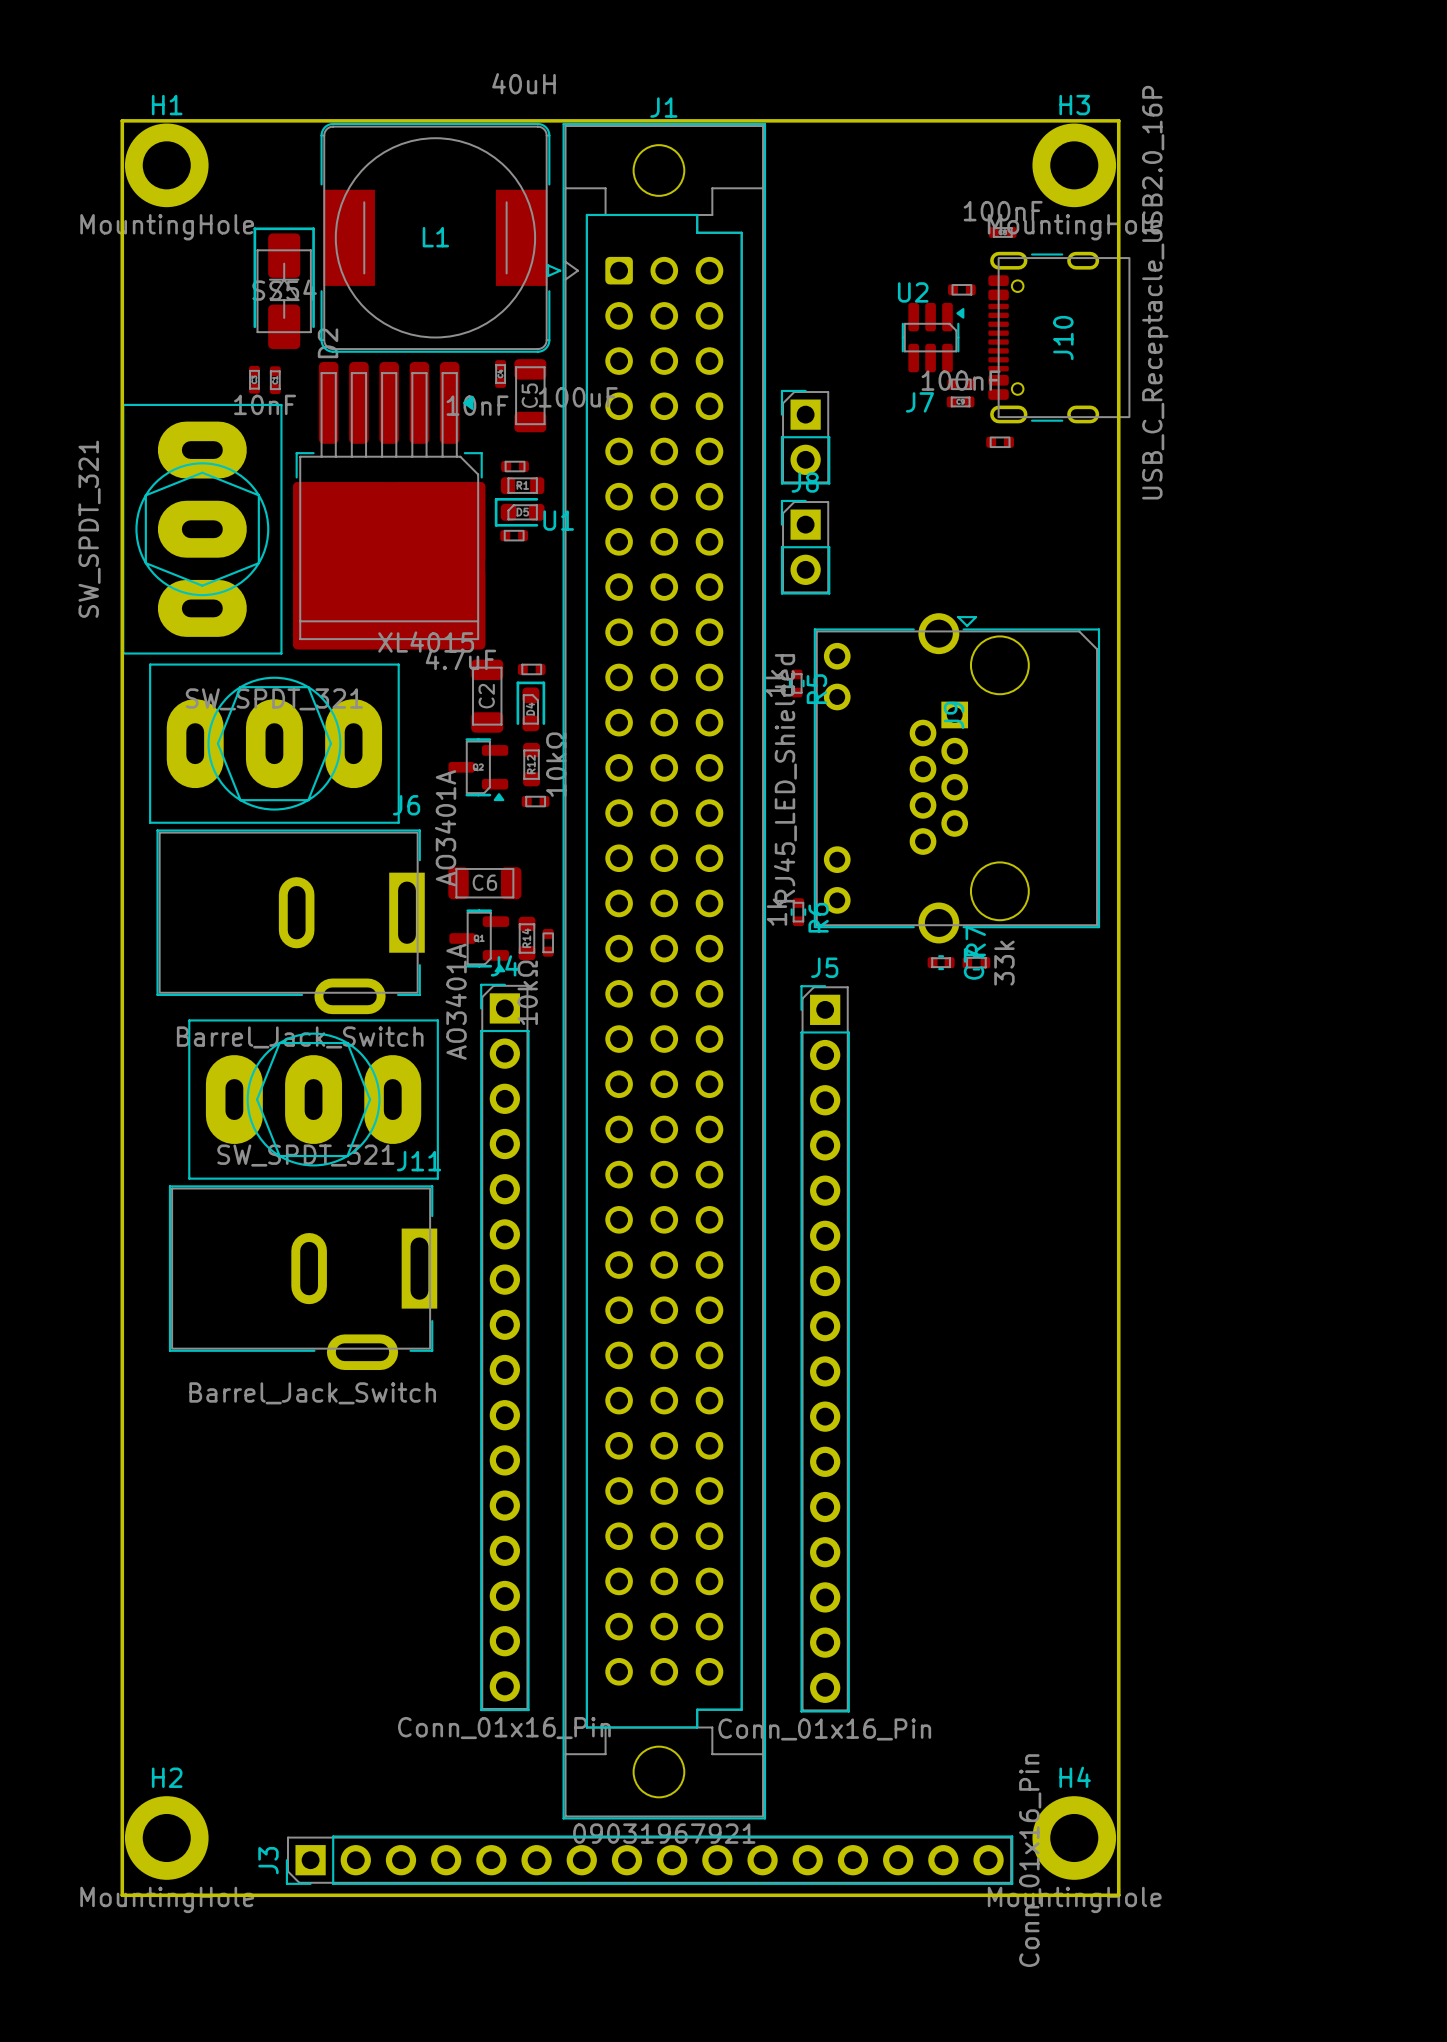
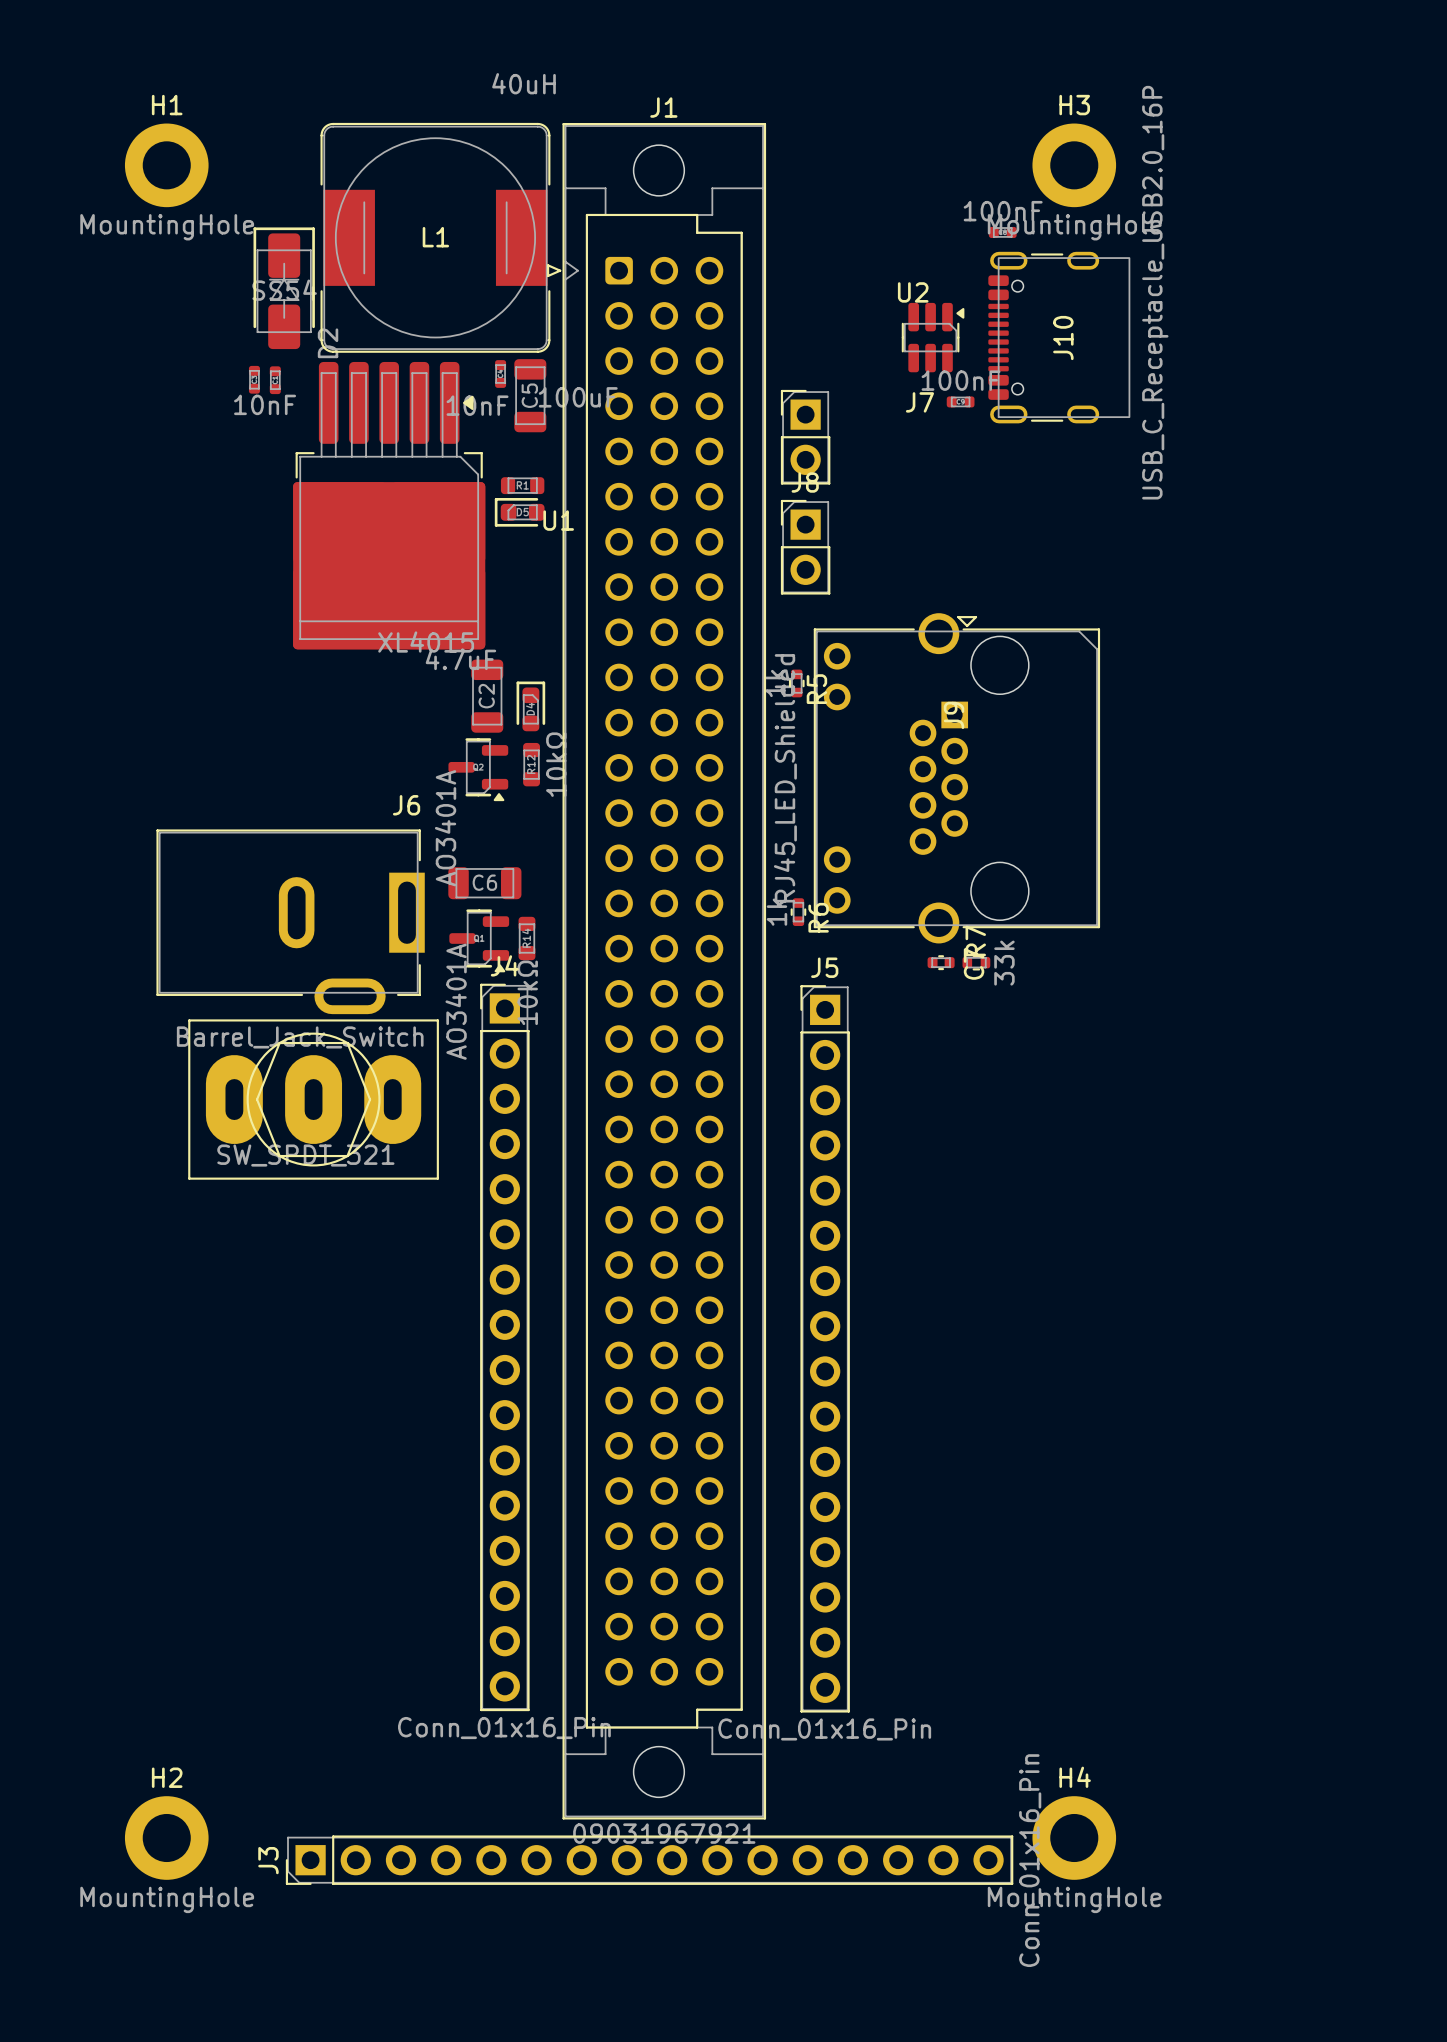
board edge: (122, 120) (1118, 120) (1118, 1895) (122, 1895) (122, 120) -> none
part: (961, 289) -> none
part: (961, 384) -> none
part: (1000, 442) -> none
part: (515, 466) -> none
part: SW_SPDT_321 (202, 529) -> none
part: (514, 535) -> none
part: (531, 669) -> none
part: SW_SPDT_321 (274, 743) -> none
part: (535, 801) -> none
part: (548, 942) -> none
J11: Barrel_Jack_Switch (303, 1277) -> none

